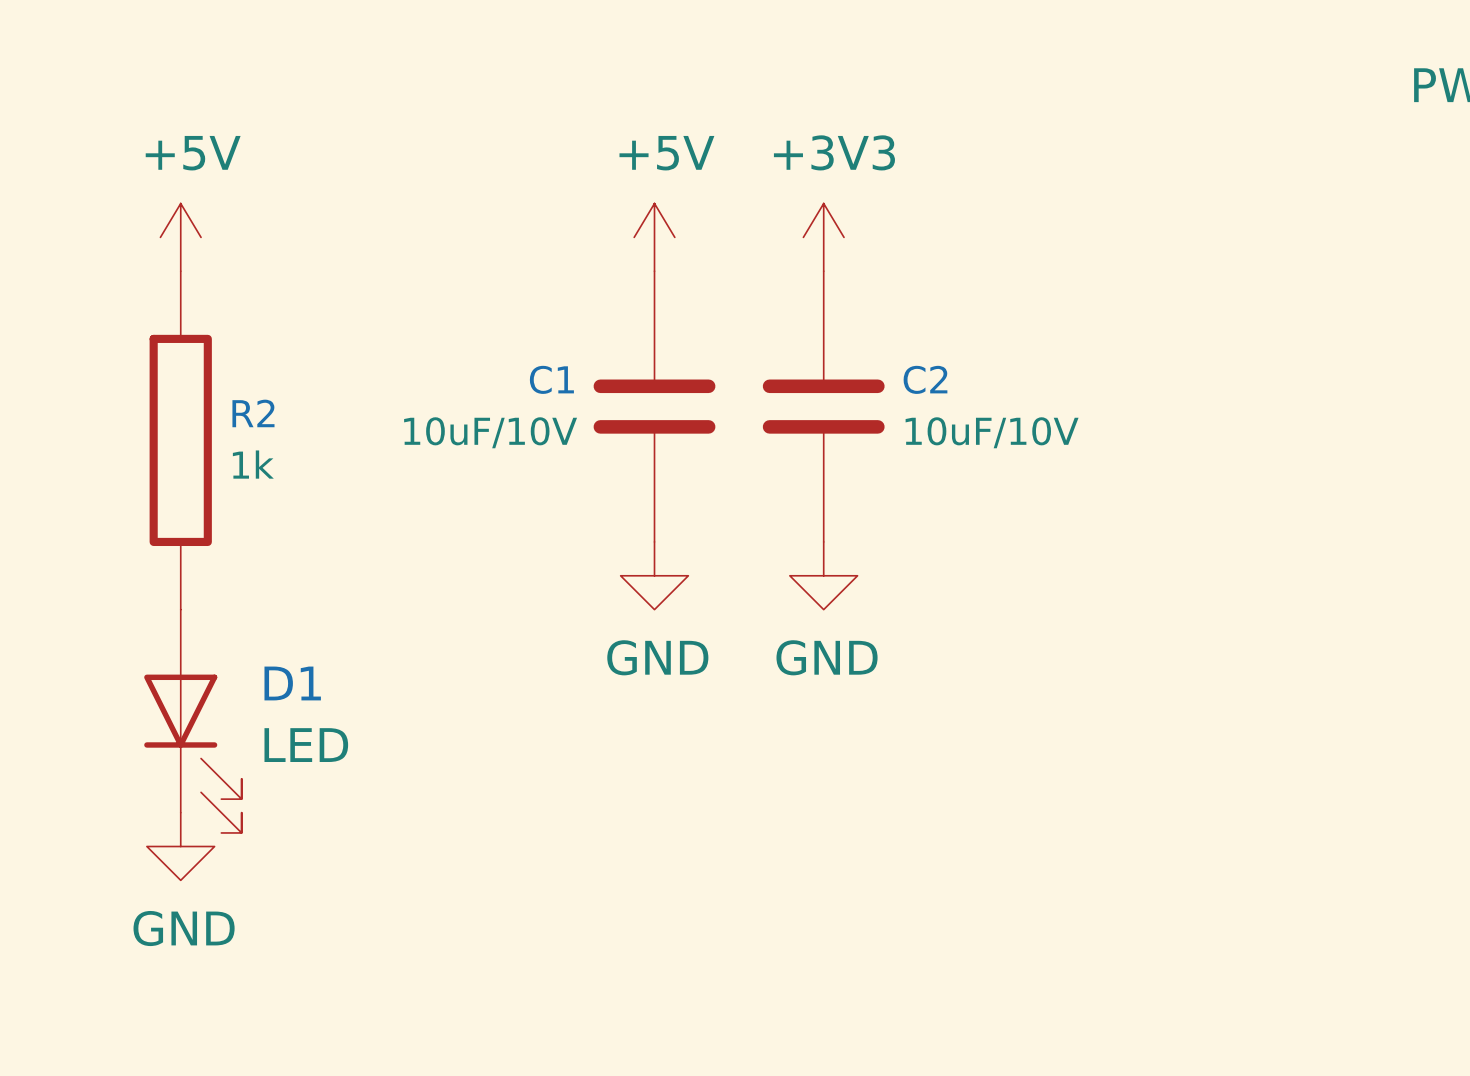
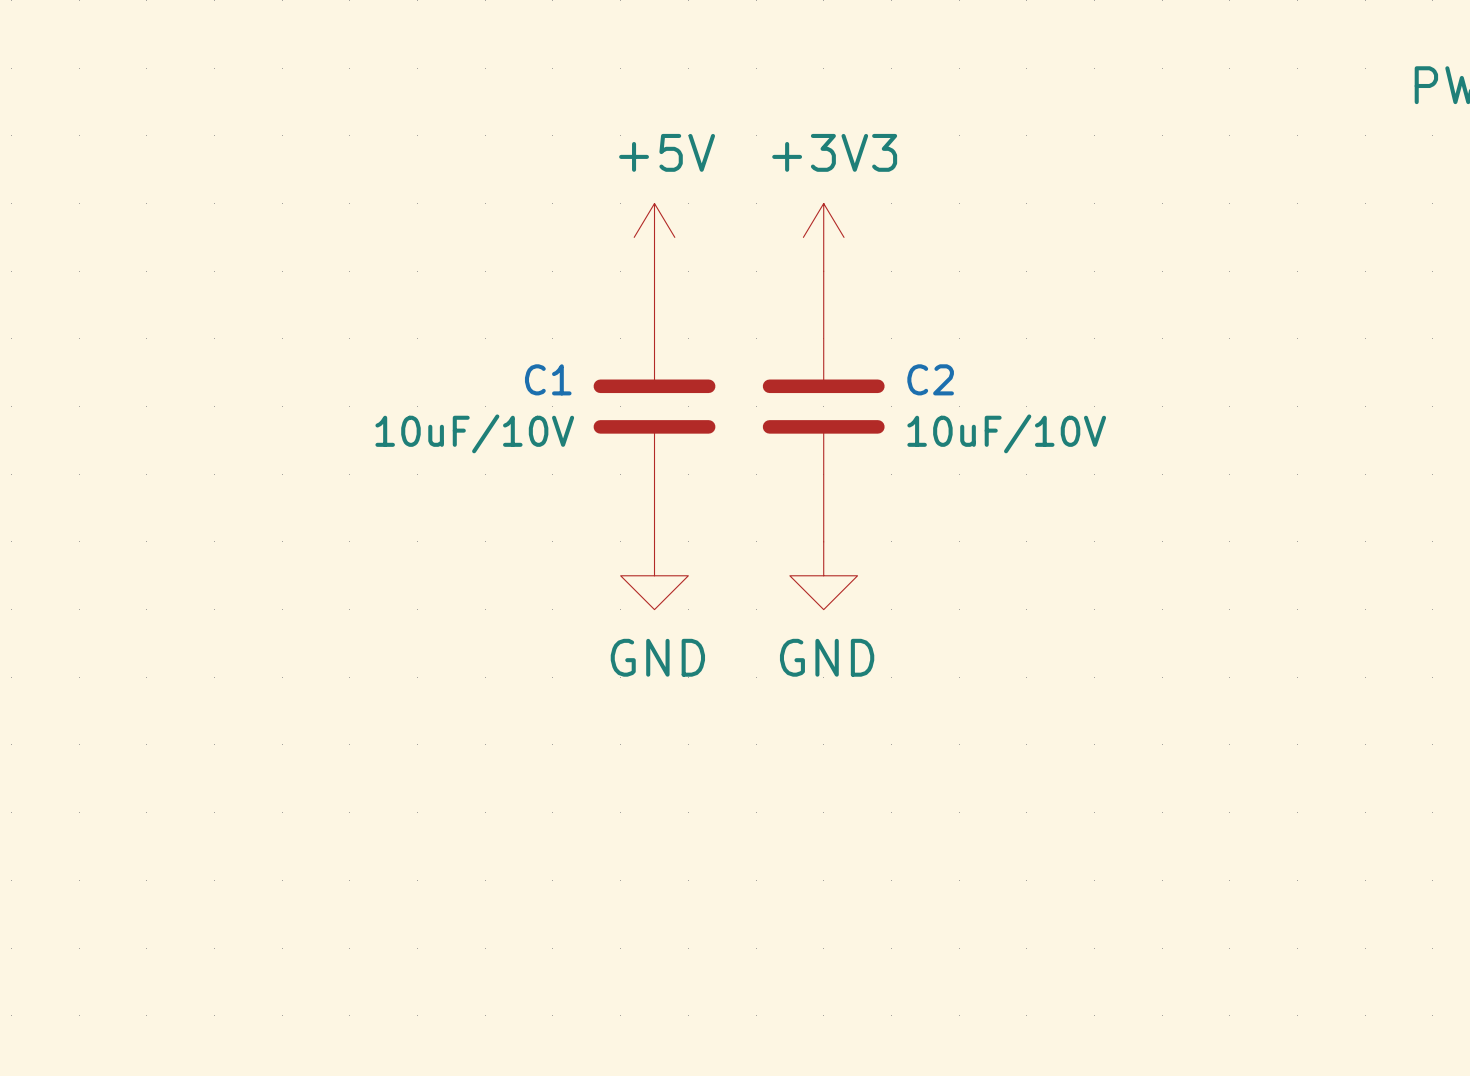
power symbol: +5V (180, 237) -> none
R2: 1k (180, 440) -> none
D1: LED (192, 721) -> none
power symbol: GND (180, 846) -> none

